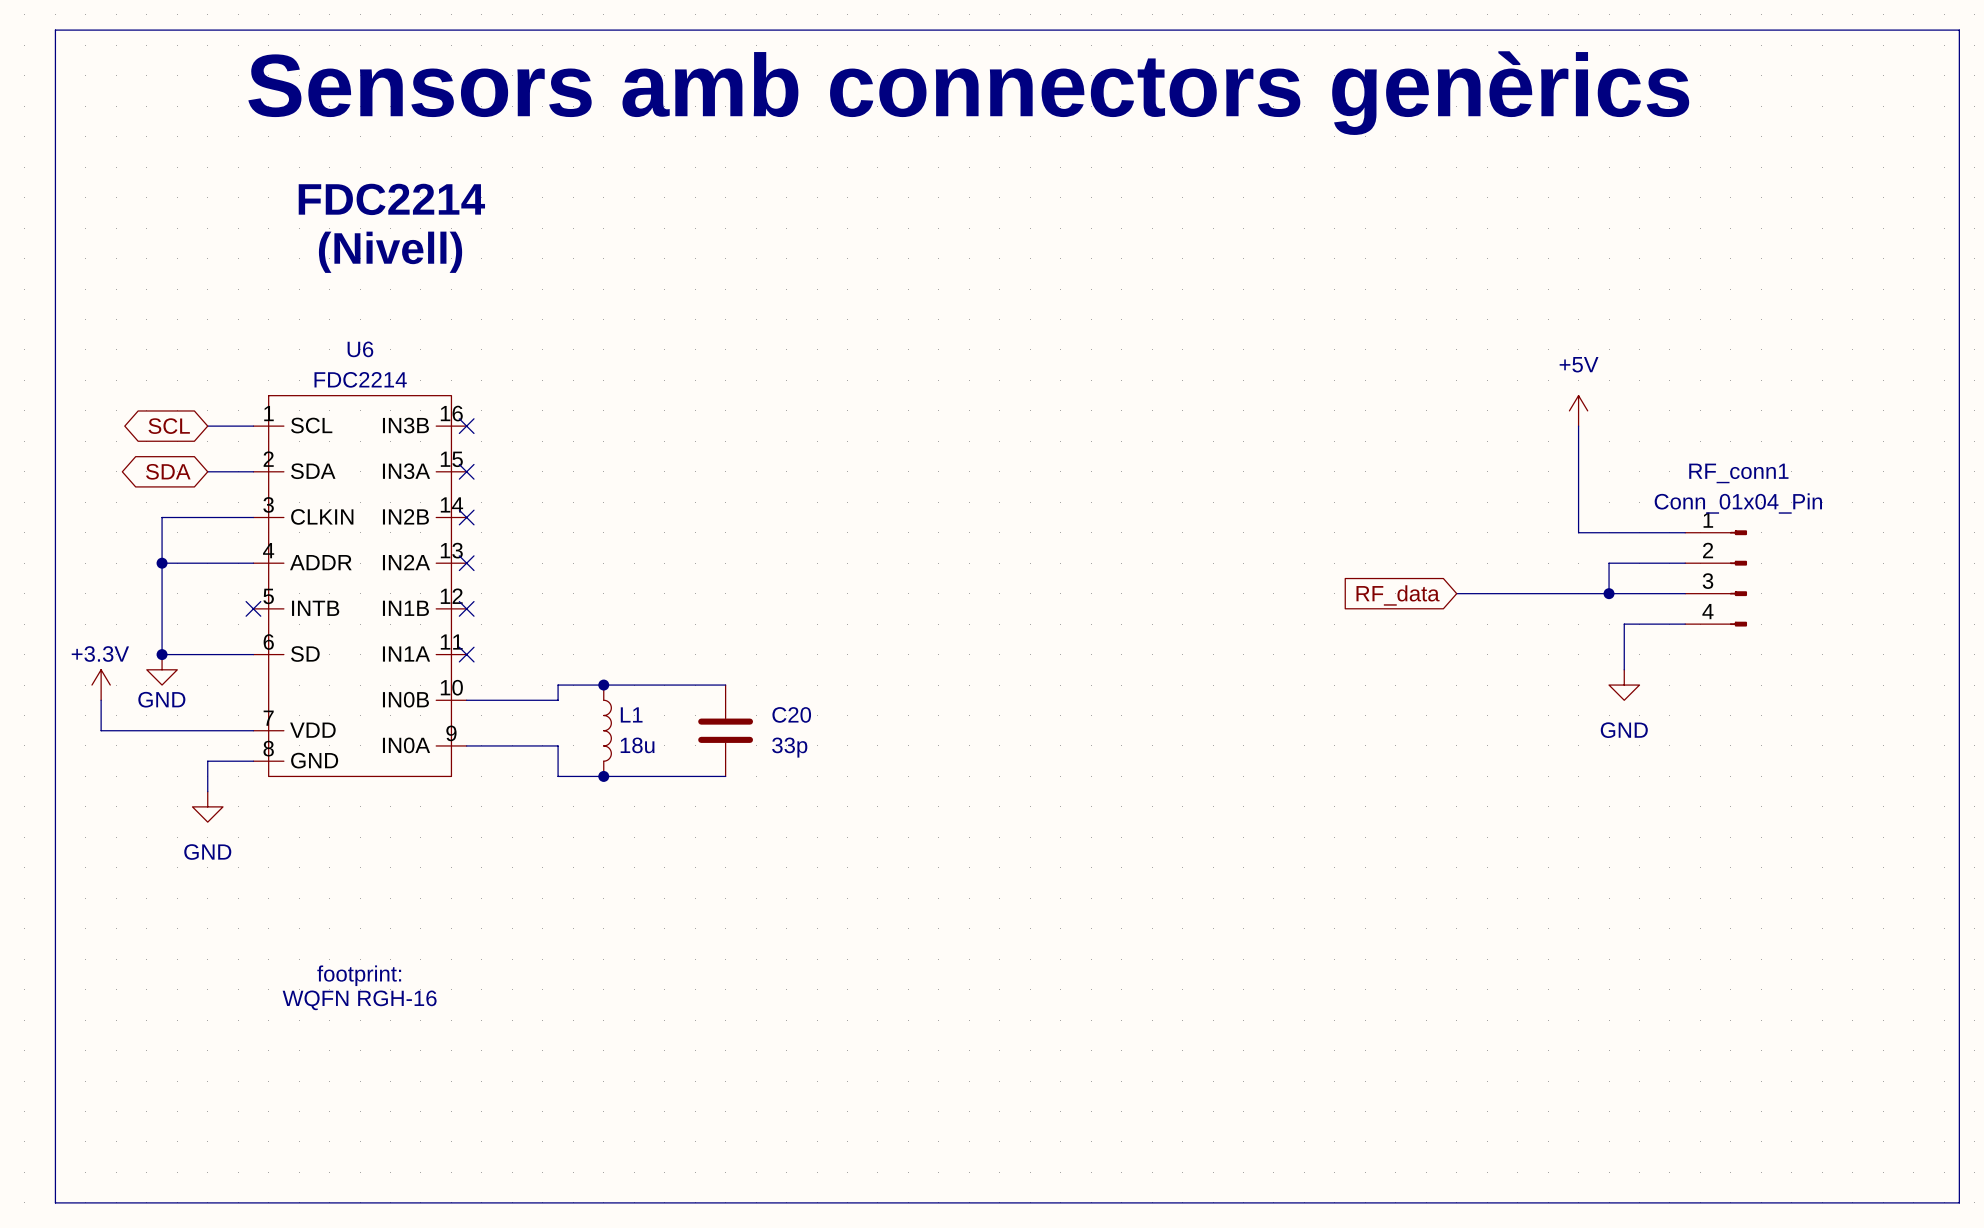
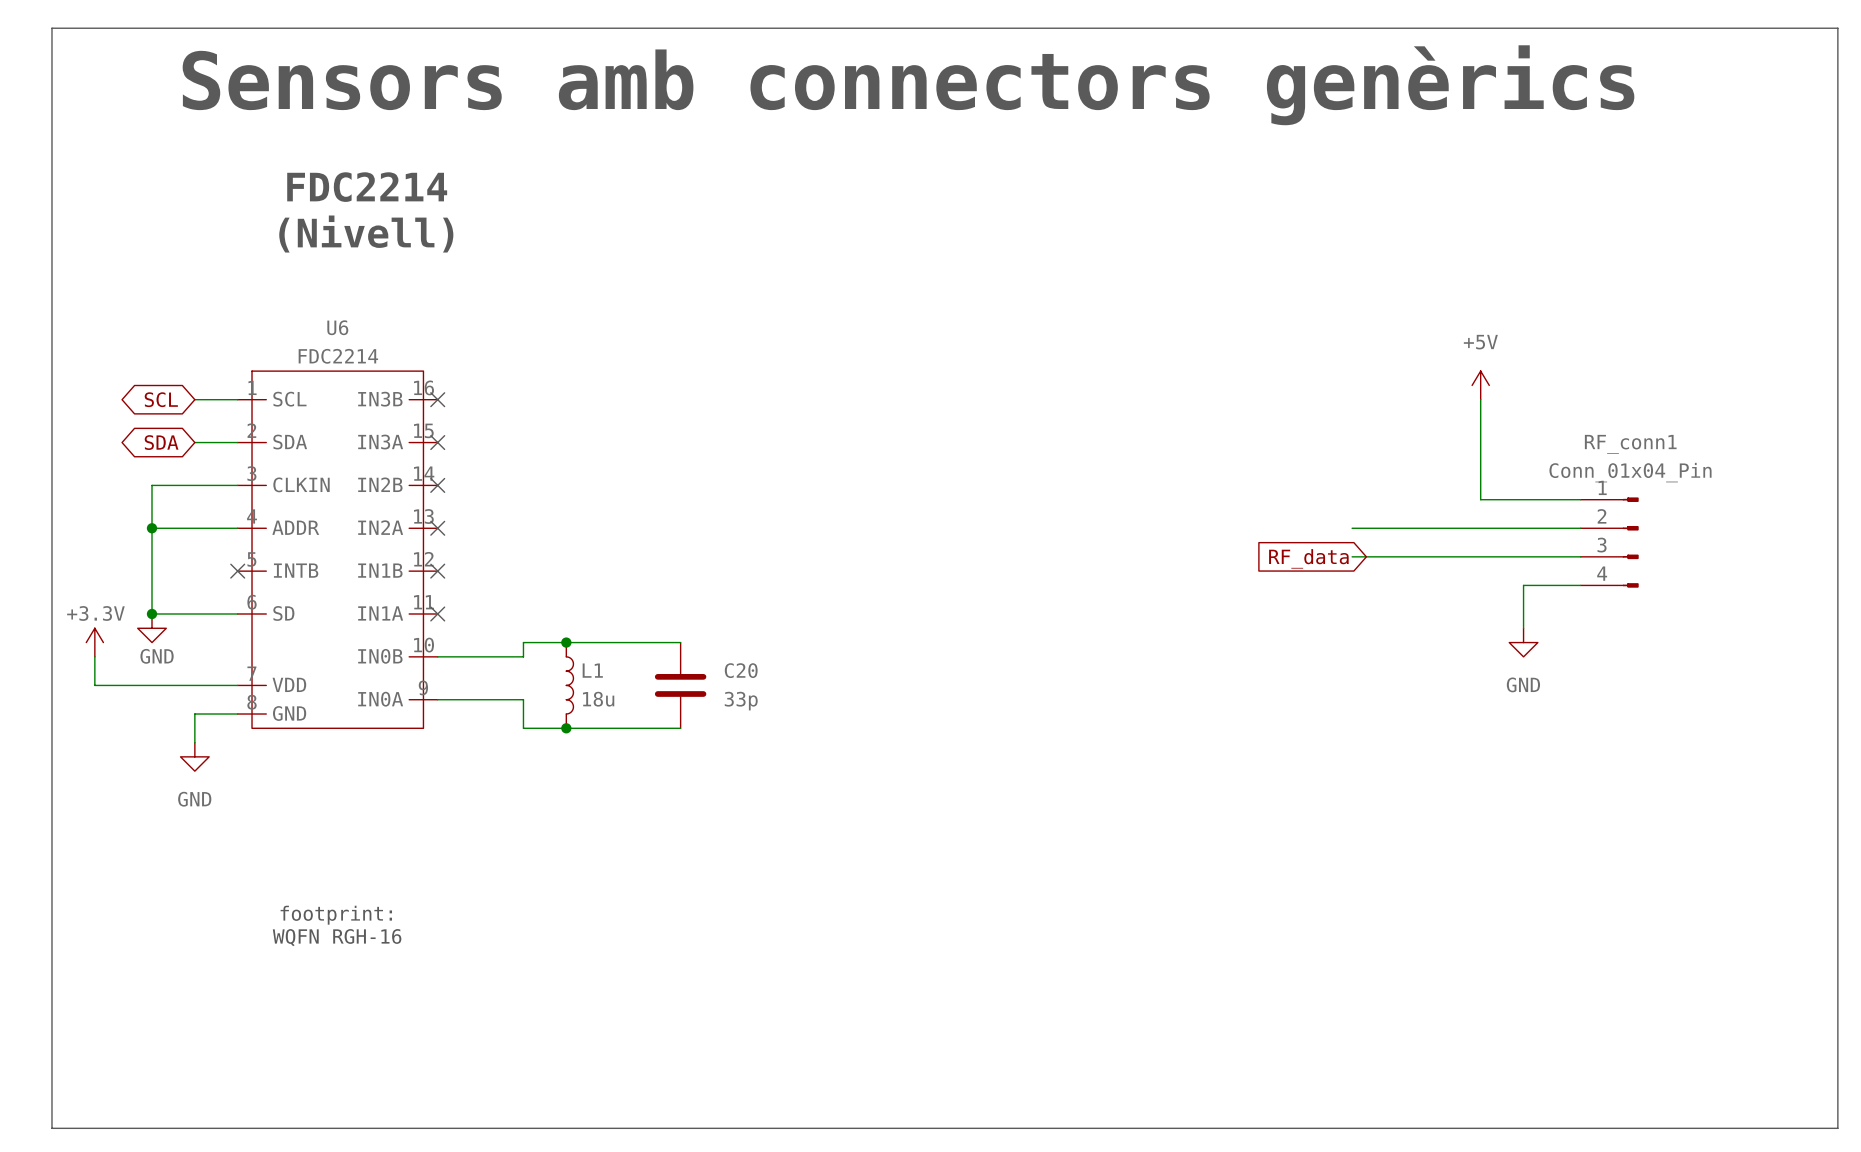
wire: (1609, 563) (1609, 593) -> (1509, 528) (1352, 528)
wire: none -> (1352, 556) (1366, 556)
junction: (1609, 593) -> none

